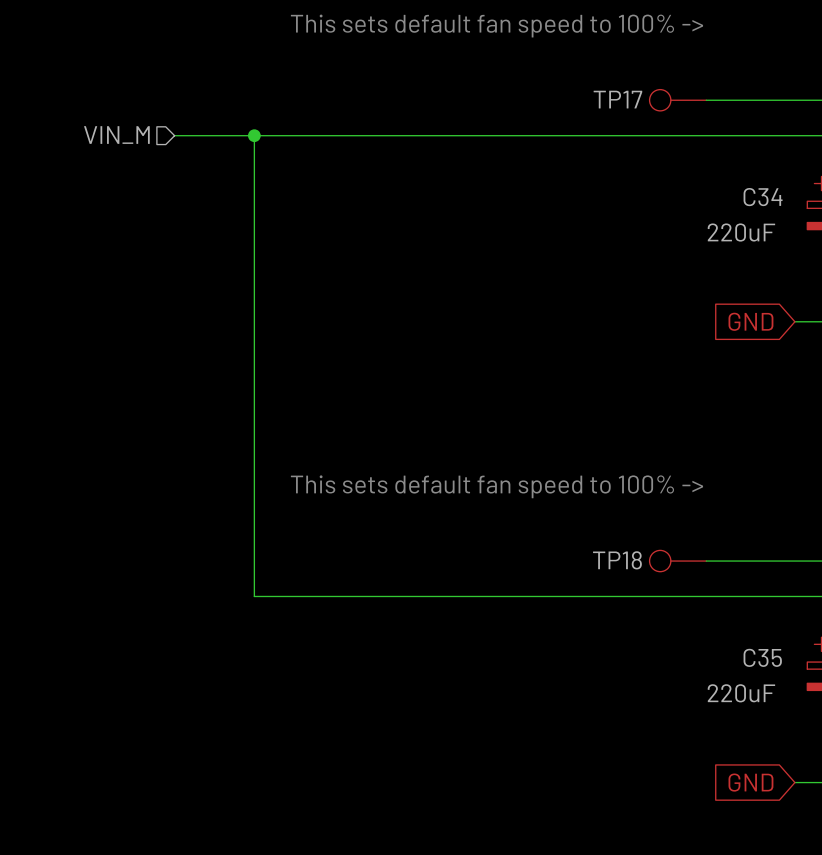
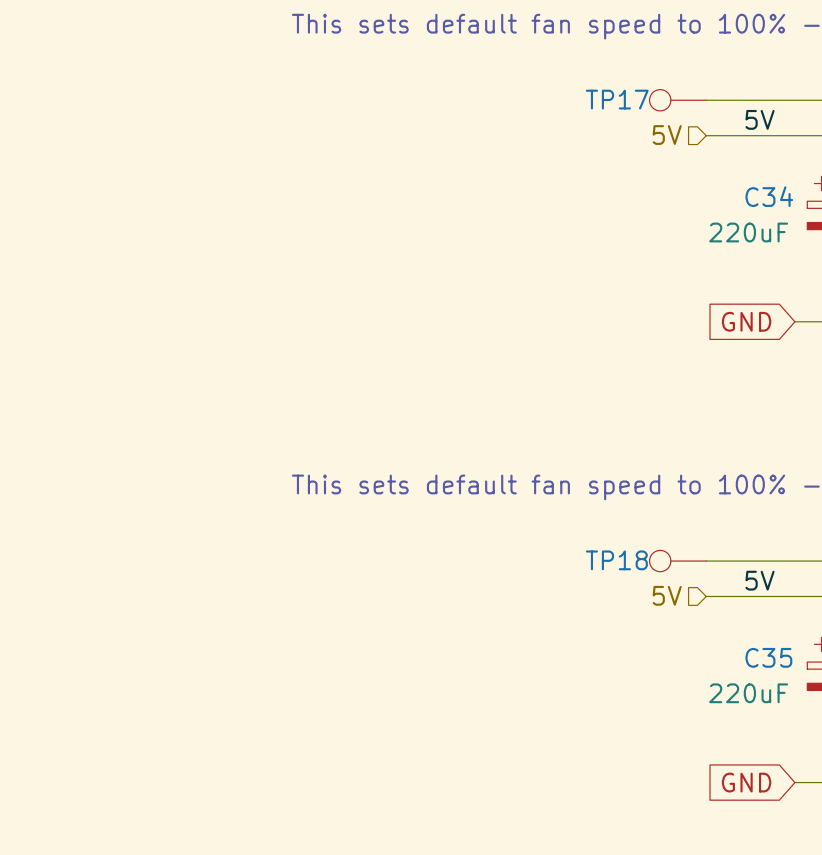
label: none -> 5V (760, 119)
hierarchical label: VIN_M (116, 135) -> none
wire: (174, 135) (706, 135) -> none
wire: (254, 135) (254, 596) (706, 596) -> none
junction: (254, 135) -> none
hierarchical label: none -> 5V (667, 135)
label: none -> 5V (760, 580)
hierarchical label: none -> 5V (667, 595)

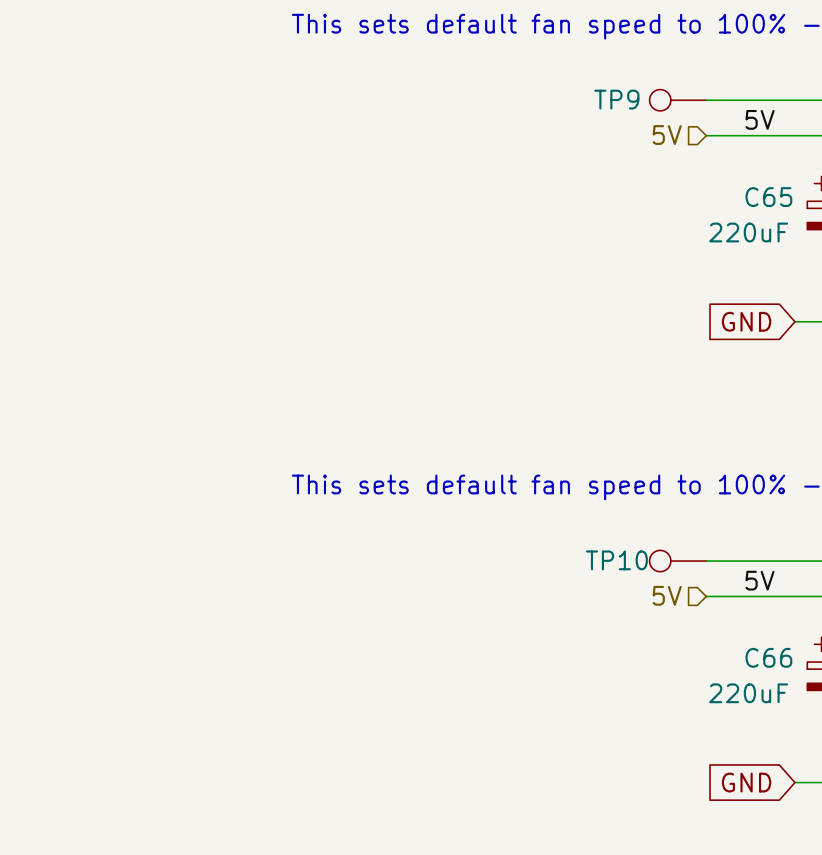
TP17 name: TP17 (617, 99) -> TP9 (616, 99)
C34 name: C34 (769, 196) -> C65 (768, 197)
TP18 name: TP18 (616, 560) -> TP10 (616, 560)
C35 name: C35 (768, 657) -> C66 (768, 657)

